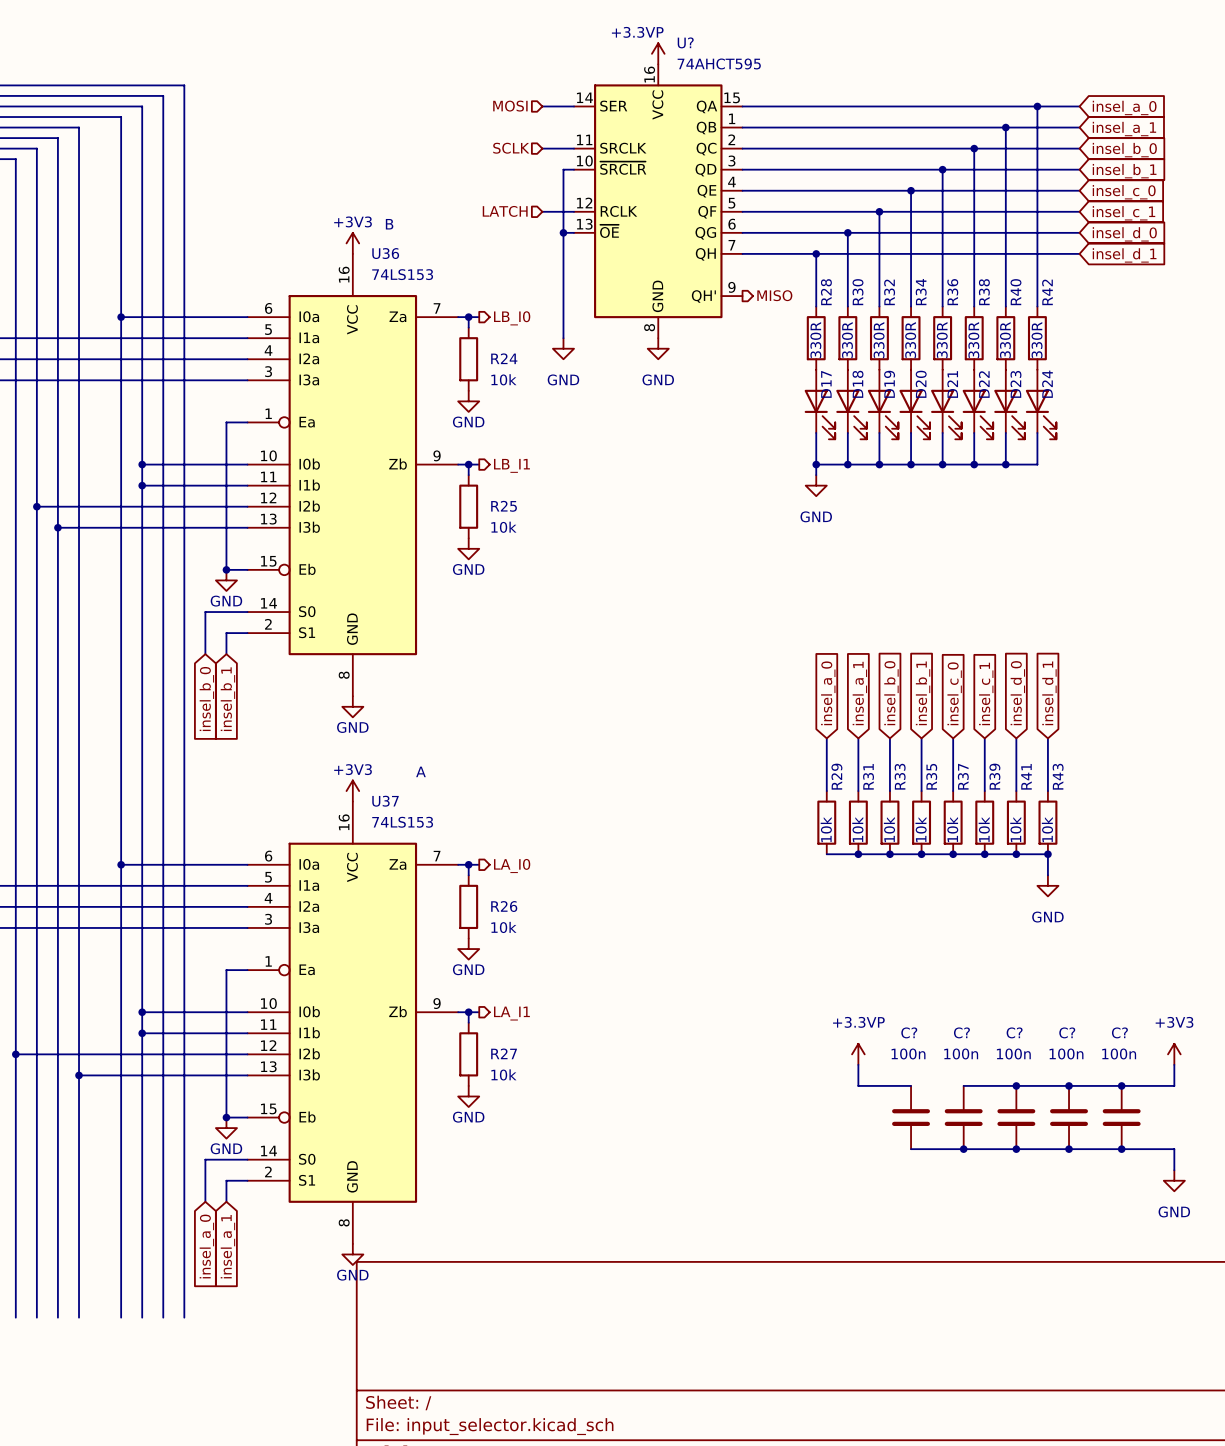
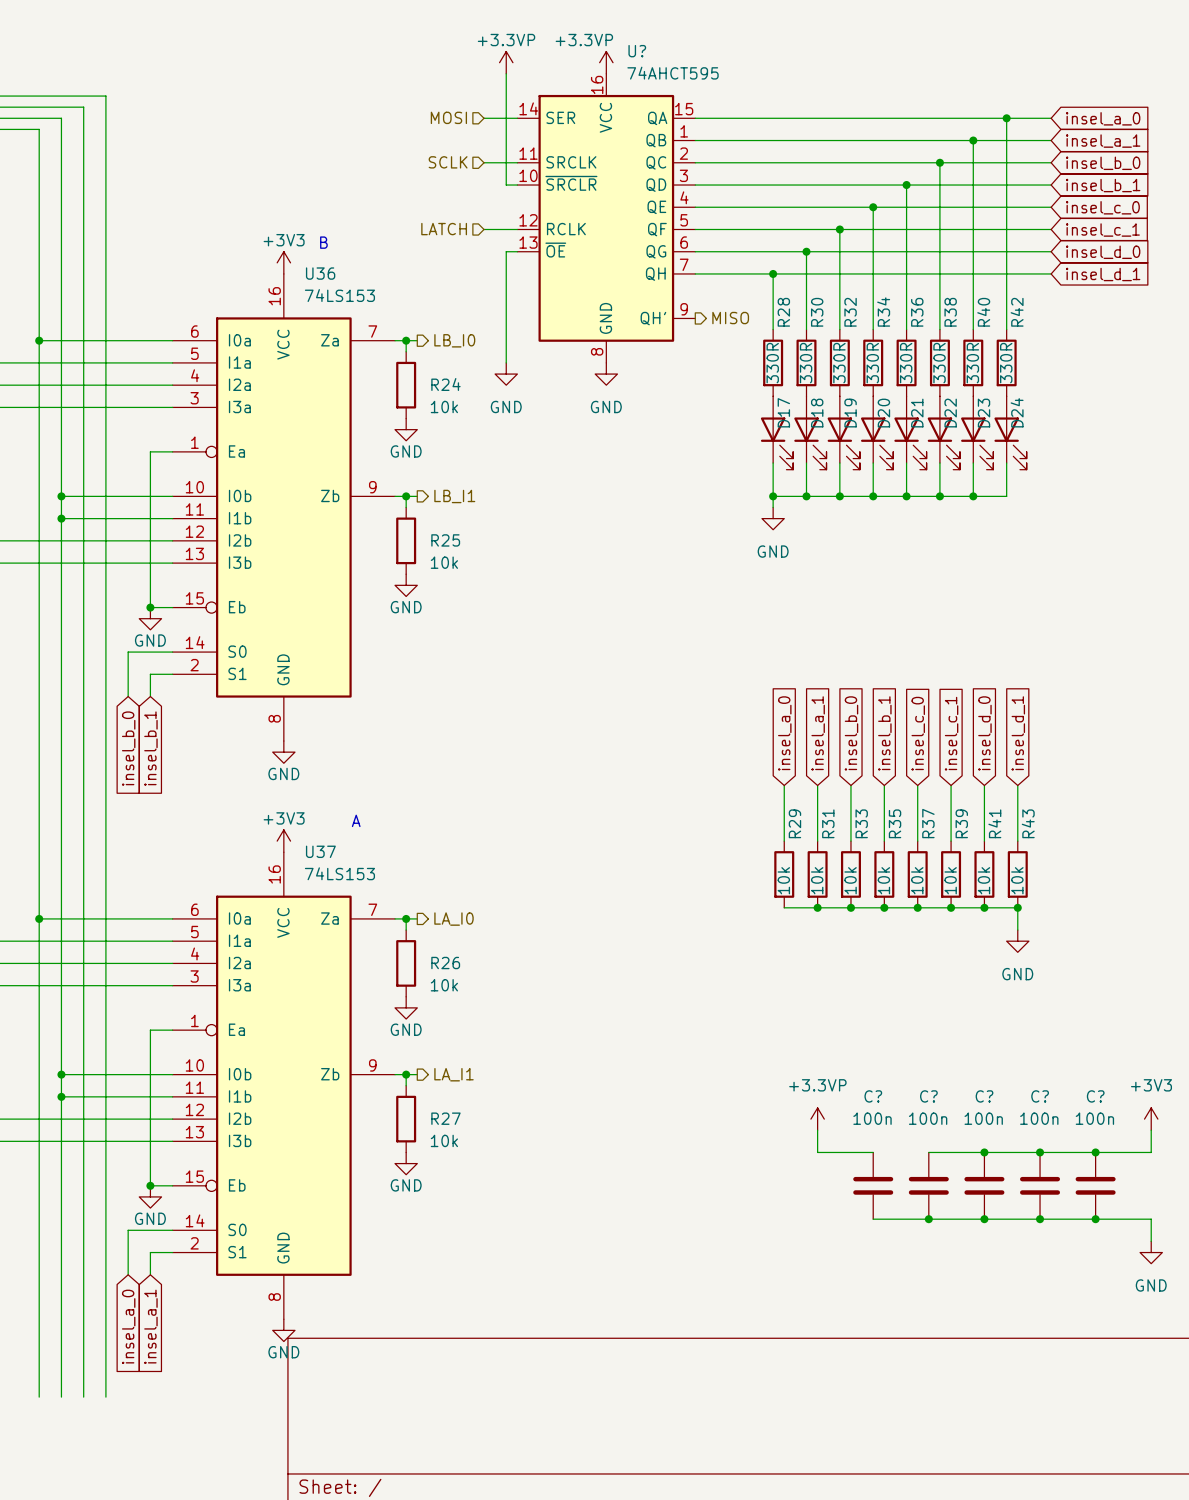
power symbol: none -> +3.3VP (506, 62)
wire: (563, 169) (563, 232) -> (506, 185) (506, 73)
junction: (563, 232) -> none

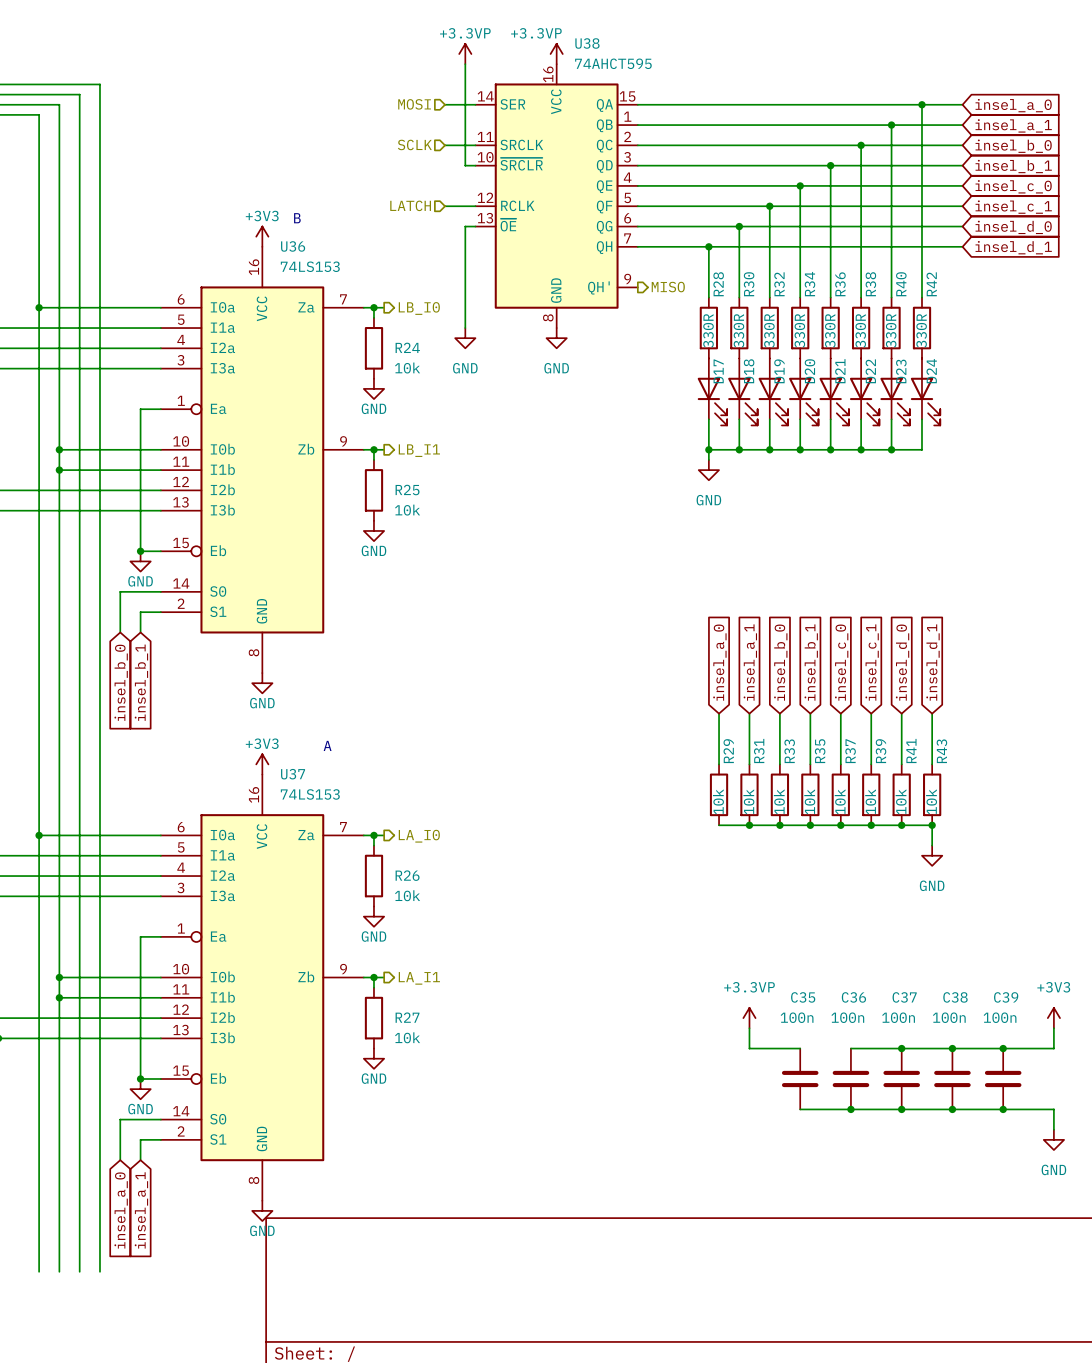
U? name: U? (637, 51) -> U38 (587, 43)
C? name: C? (873, 1096) -> C35 (803, 997)
C? name: C? (928, 1096) -> C36 (853, 997)
C? name: C? (984, 1096) -> C37 (904, 997)
C? name: C? (1040, 1096) -> C38 (955, 997)
C? name: C? (1095, 1096) -> C39 (1006, 997)

